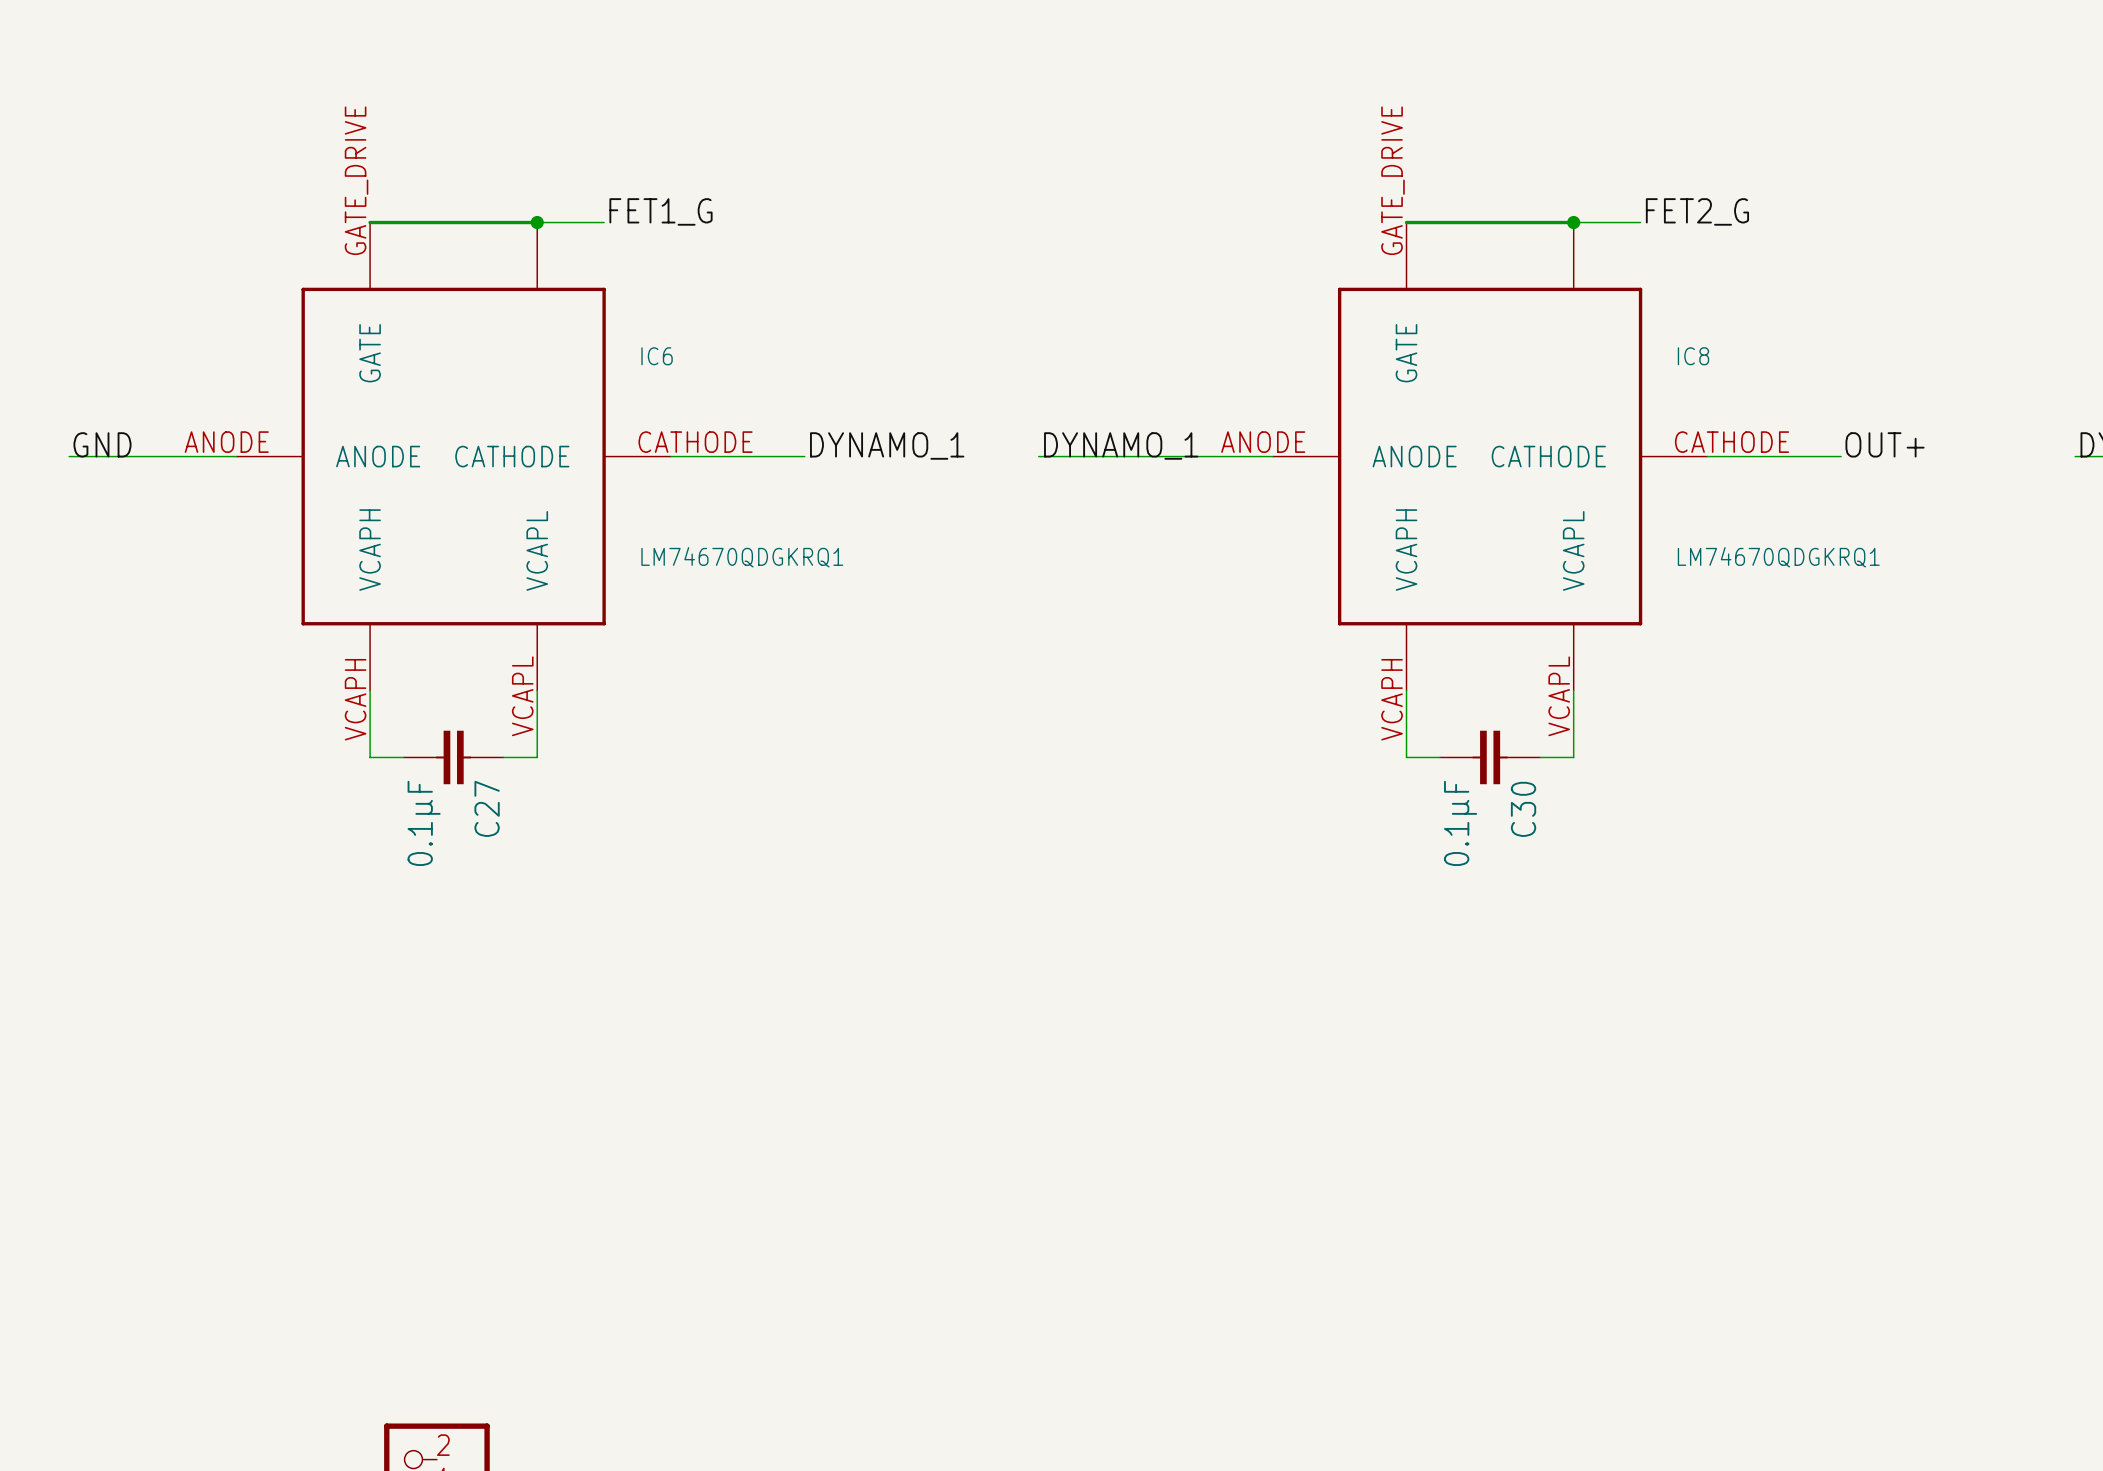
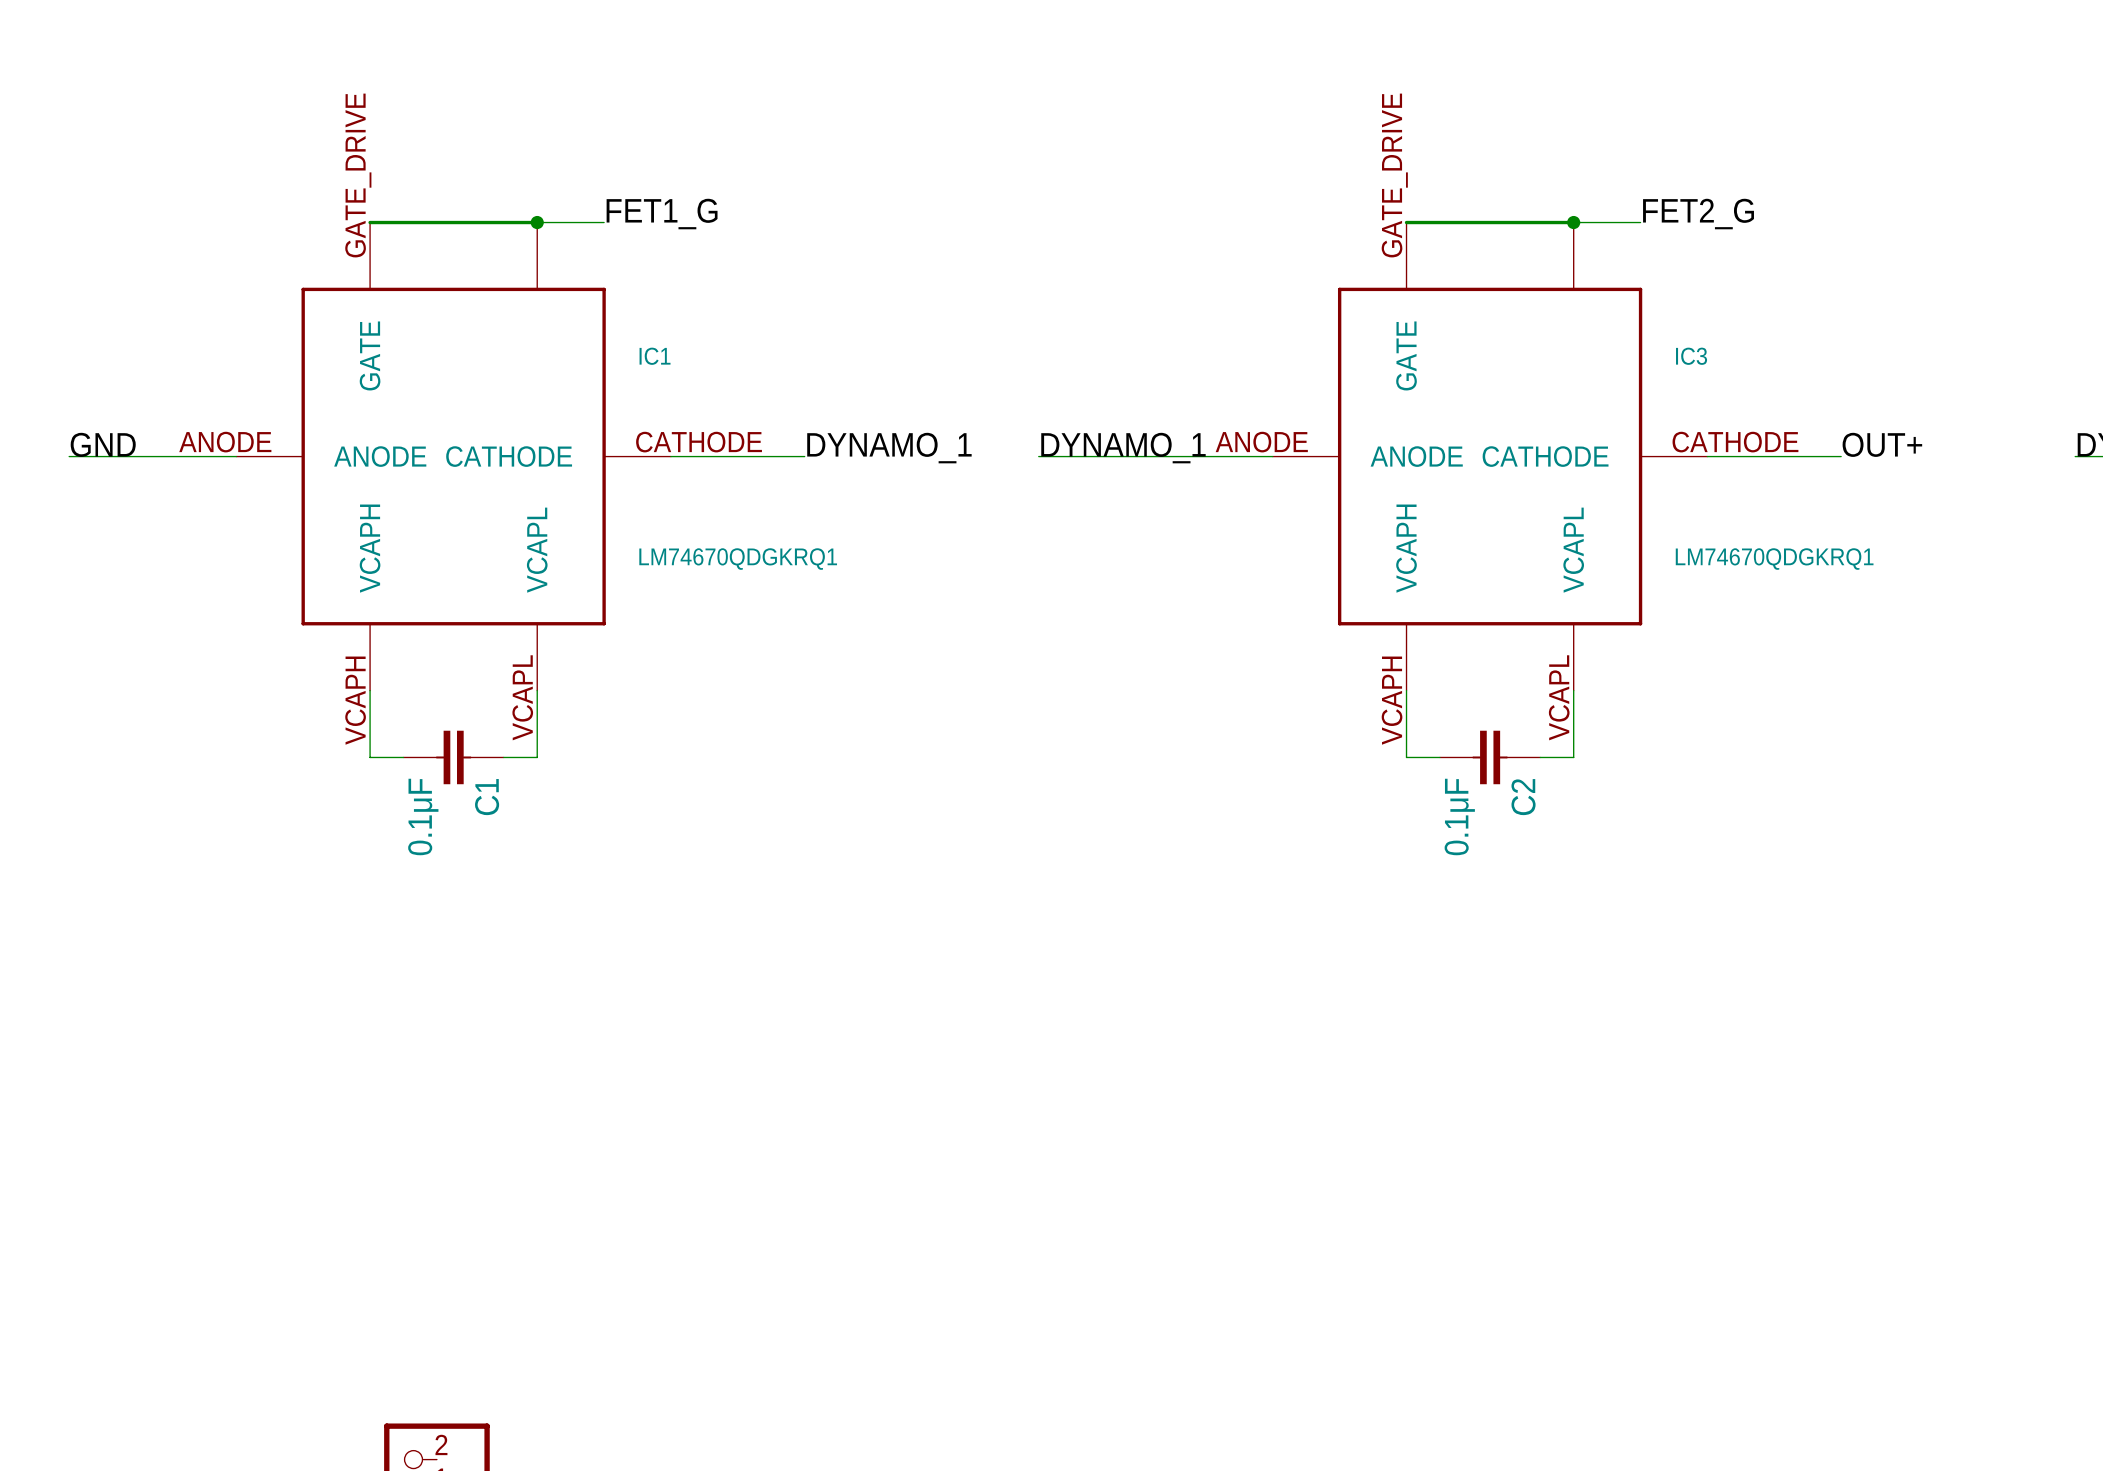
IC6 name: IC6 (657, 356) -> IC1 (655, 356)
IC8 name: IC8 (1693, 356) -> IC3 (1691, 356)
C27 name: C27 (487, 808) -> C1 (487, 797)
C30 name: C30 (1523, 809) -> C2 (1523, 797)

